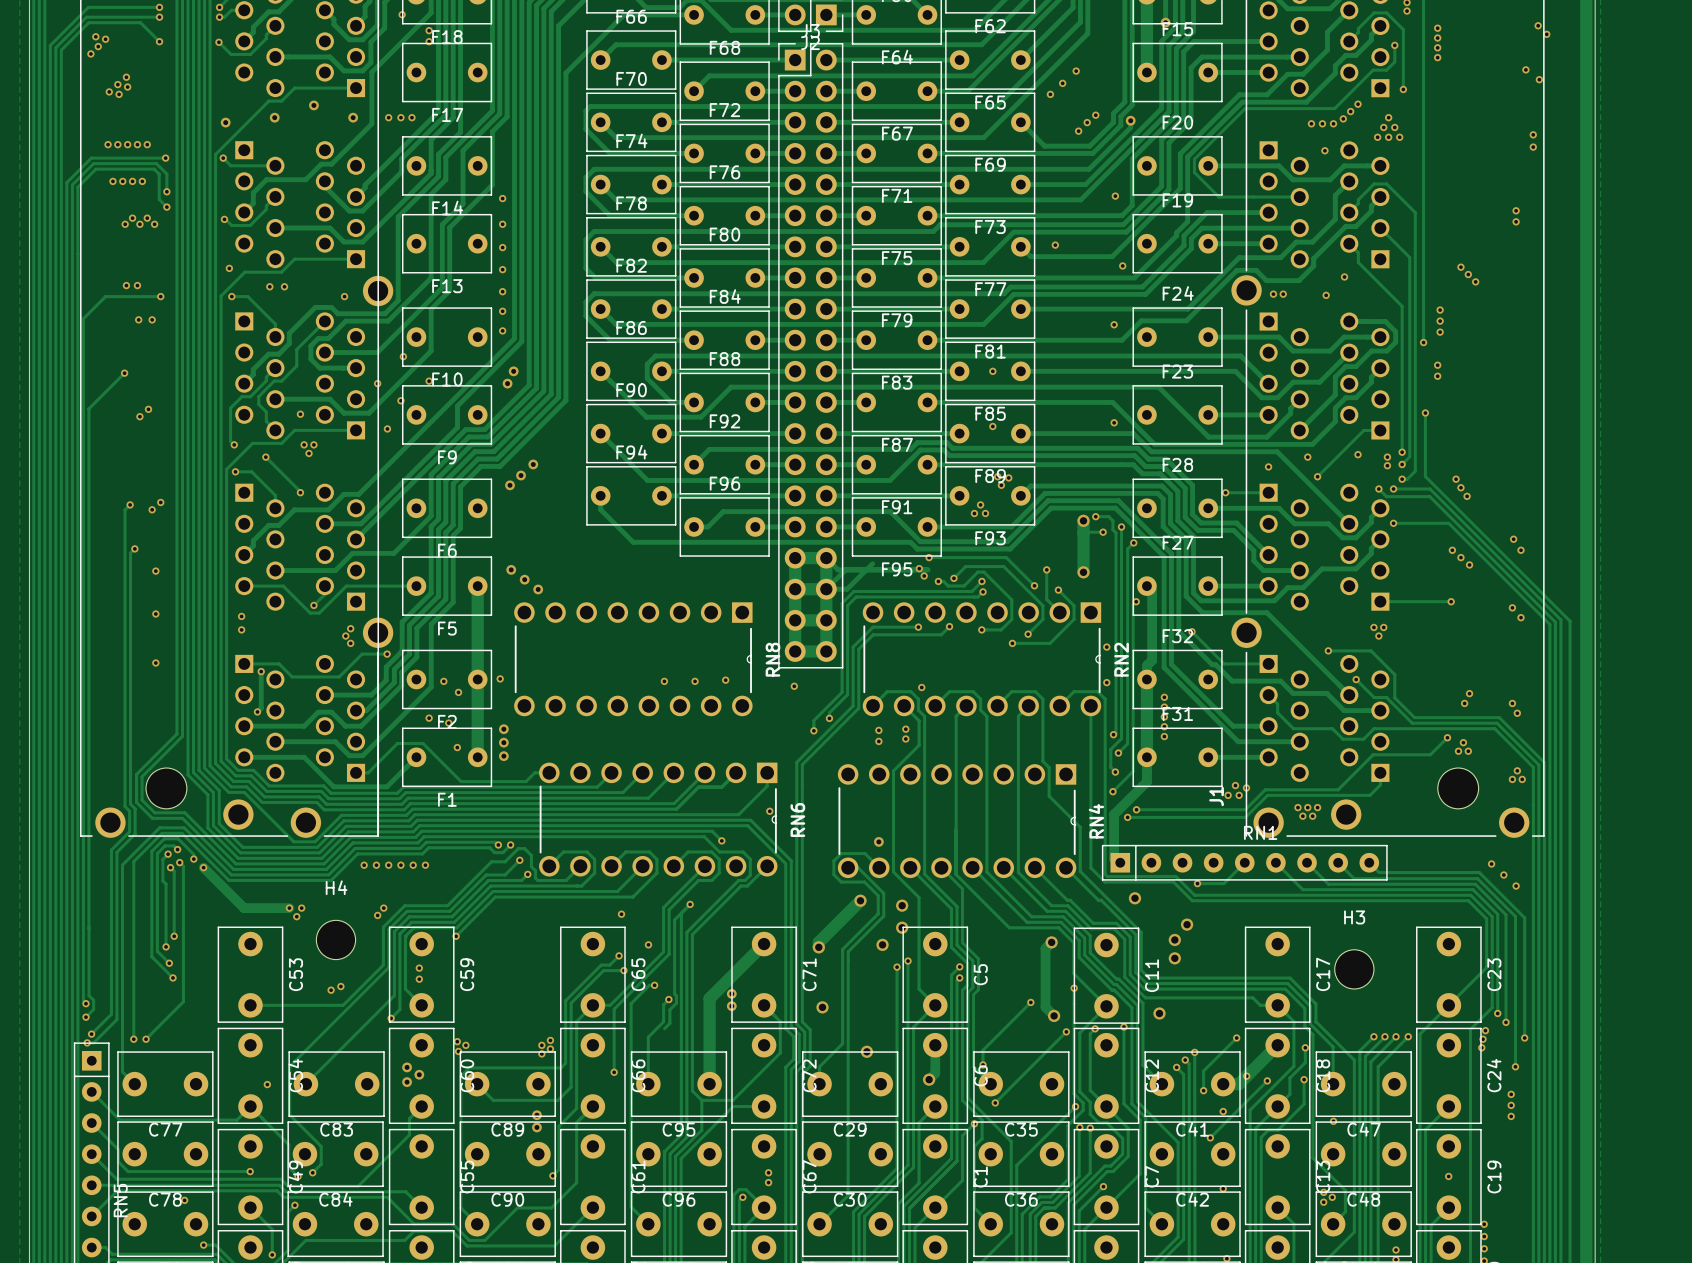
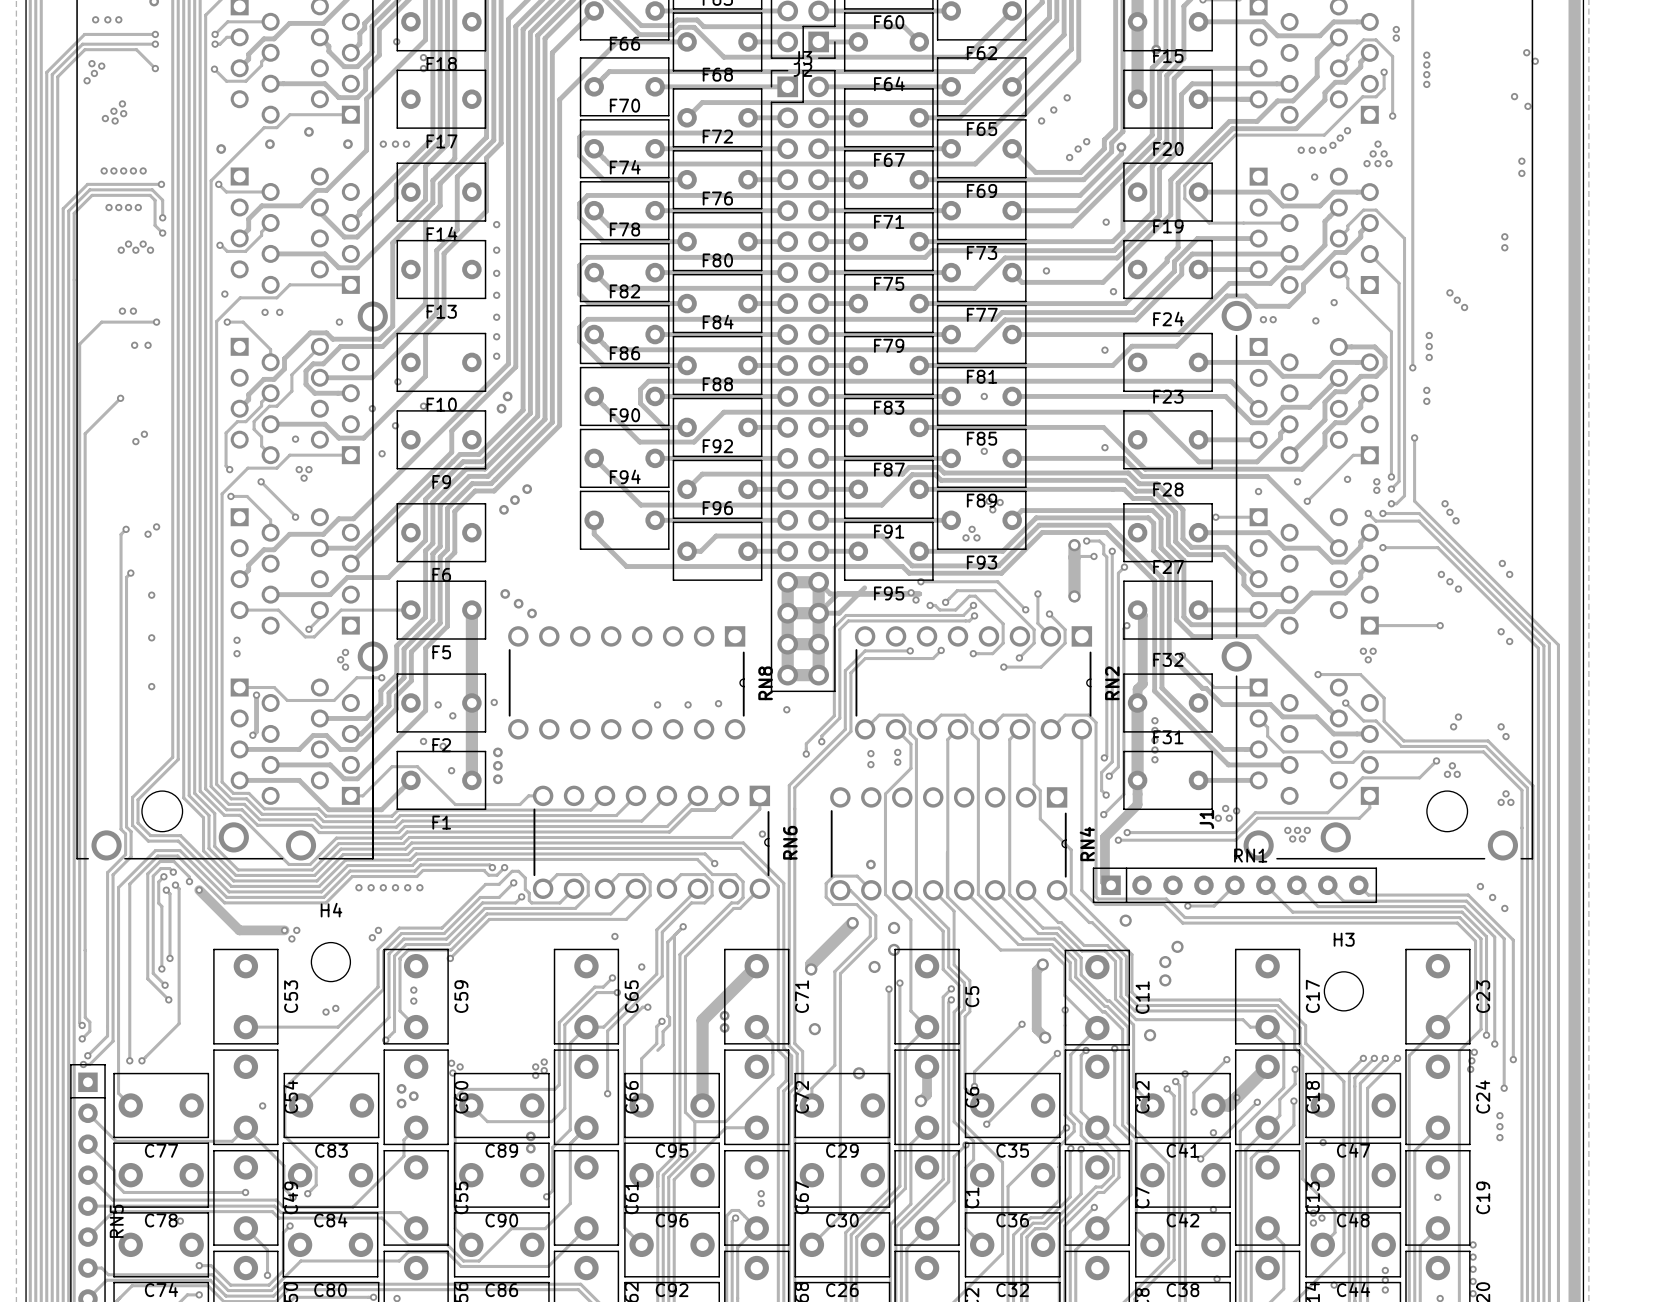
via: (1106, 647) -> none
via: (1106, 682) -> none
via: (921, 687) -> none

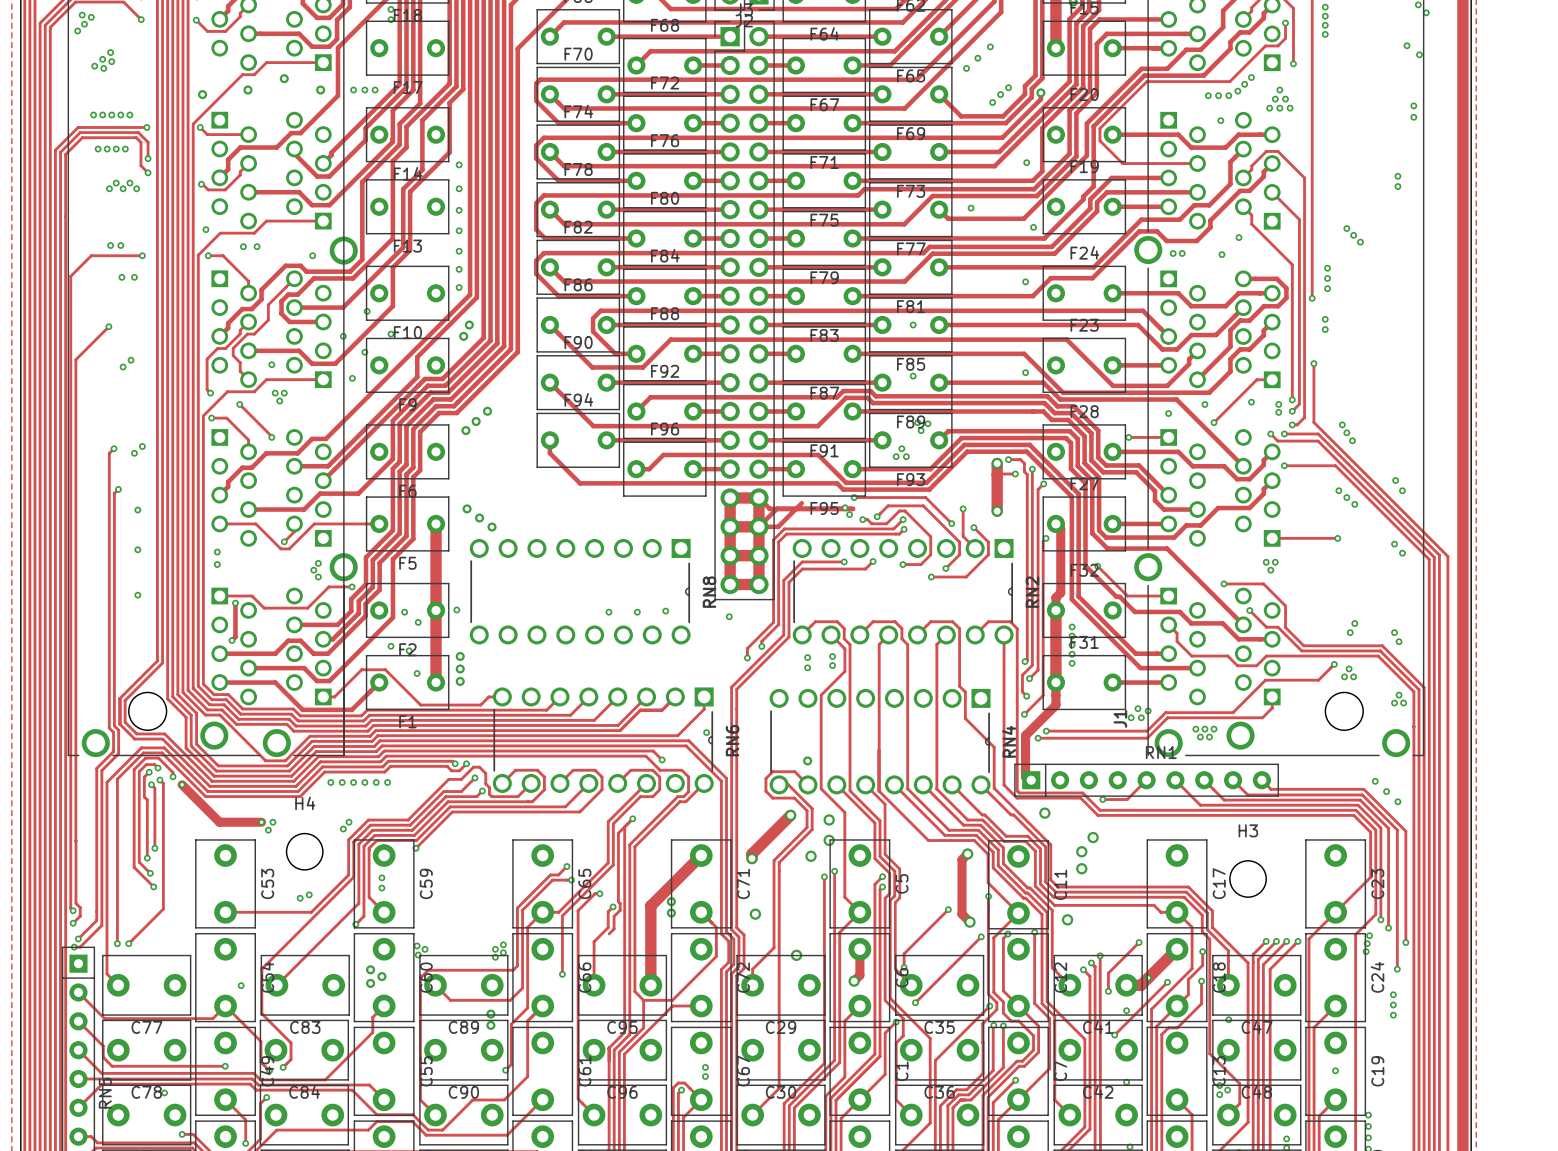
via: (614, 936) -> none
via: (641, 966) -> none

